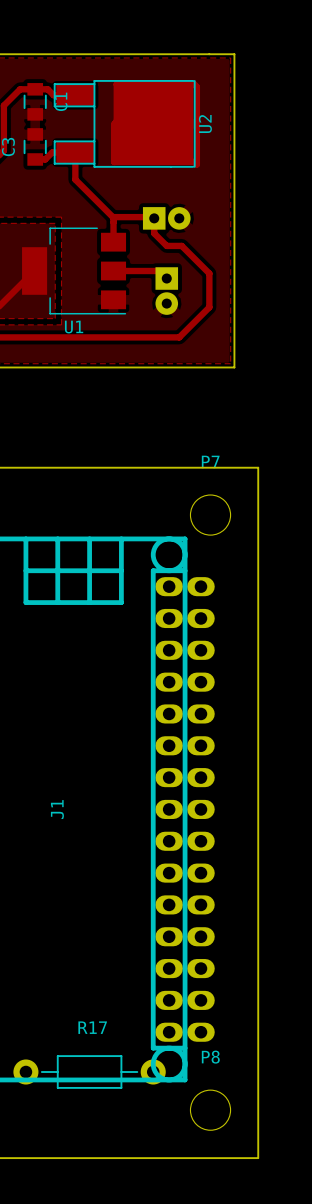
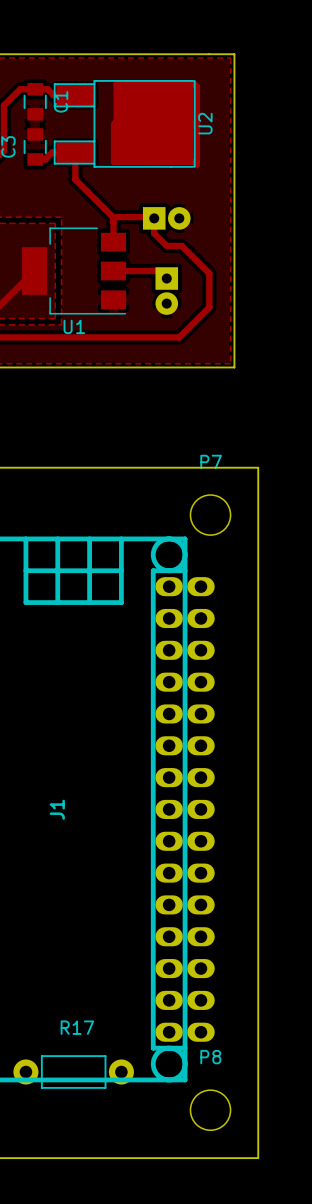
R17 footprint: [13, 1055, 166, 1089] -> [13, 1055, 134, 1089]

